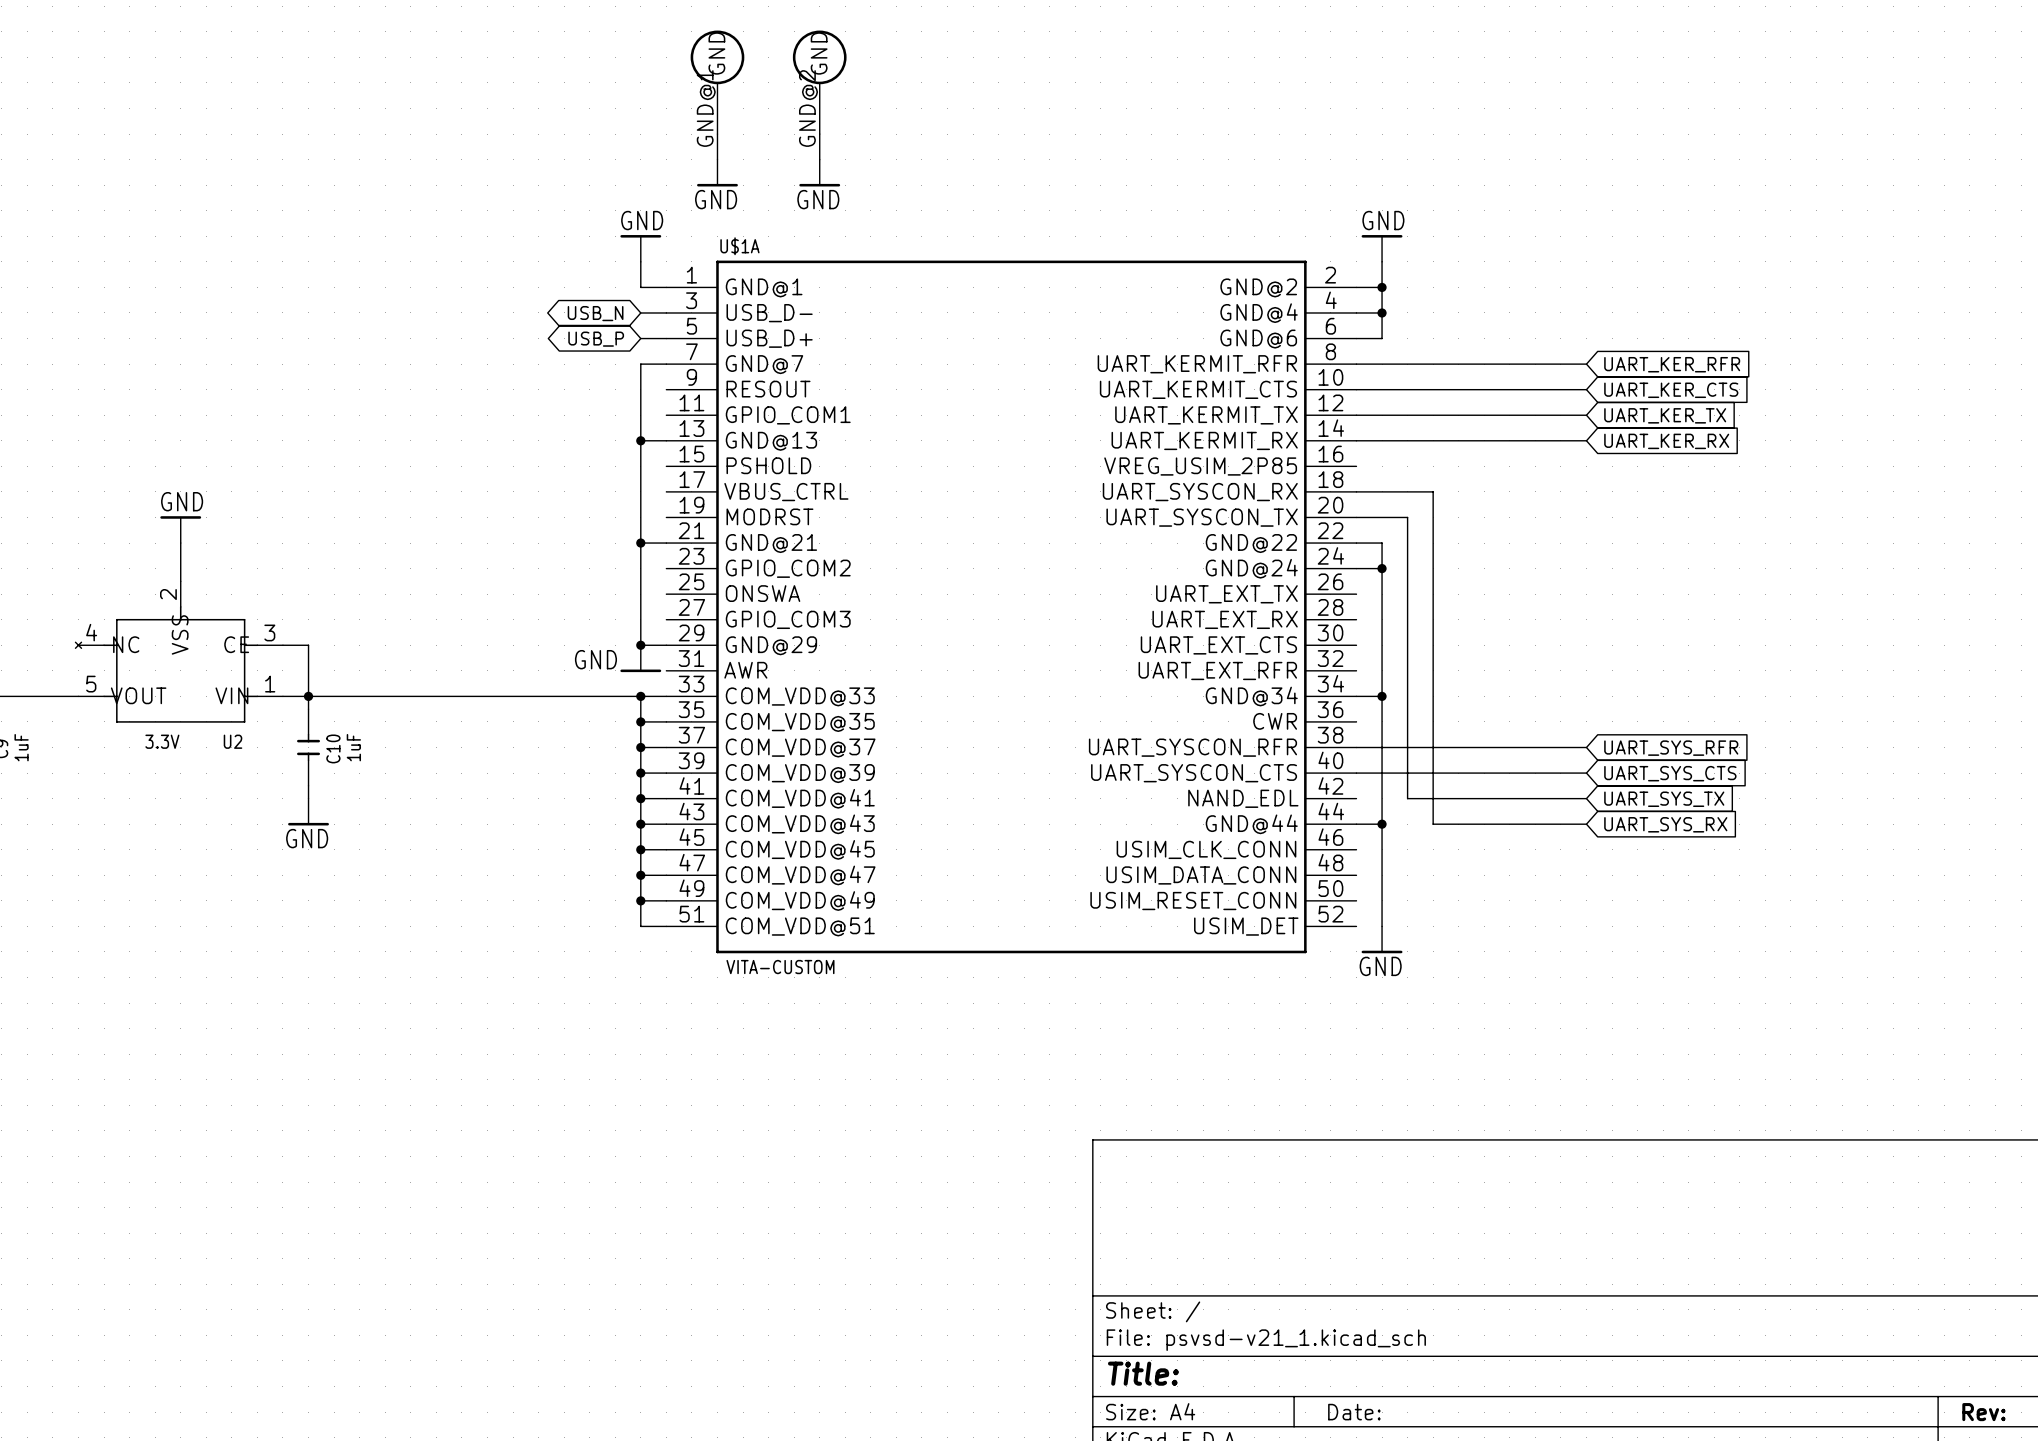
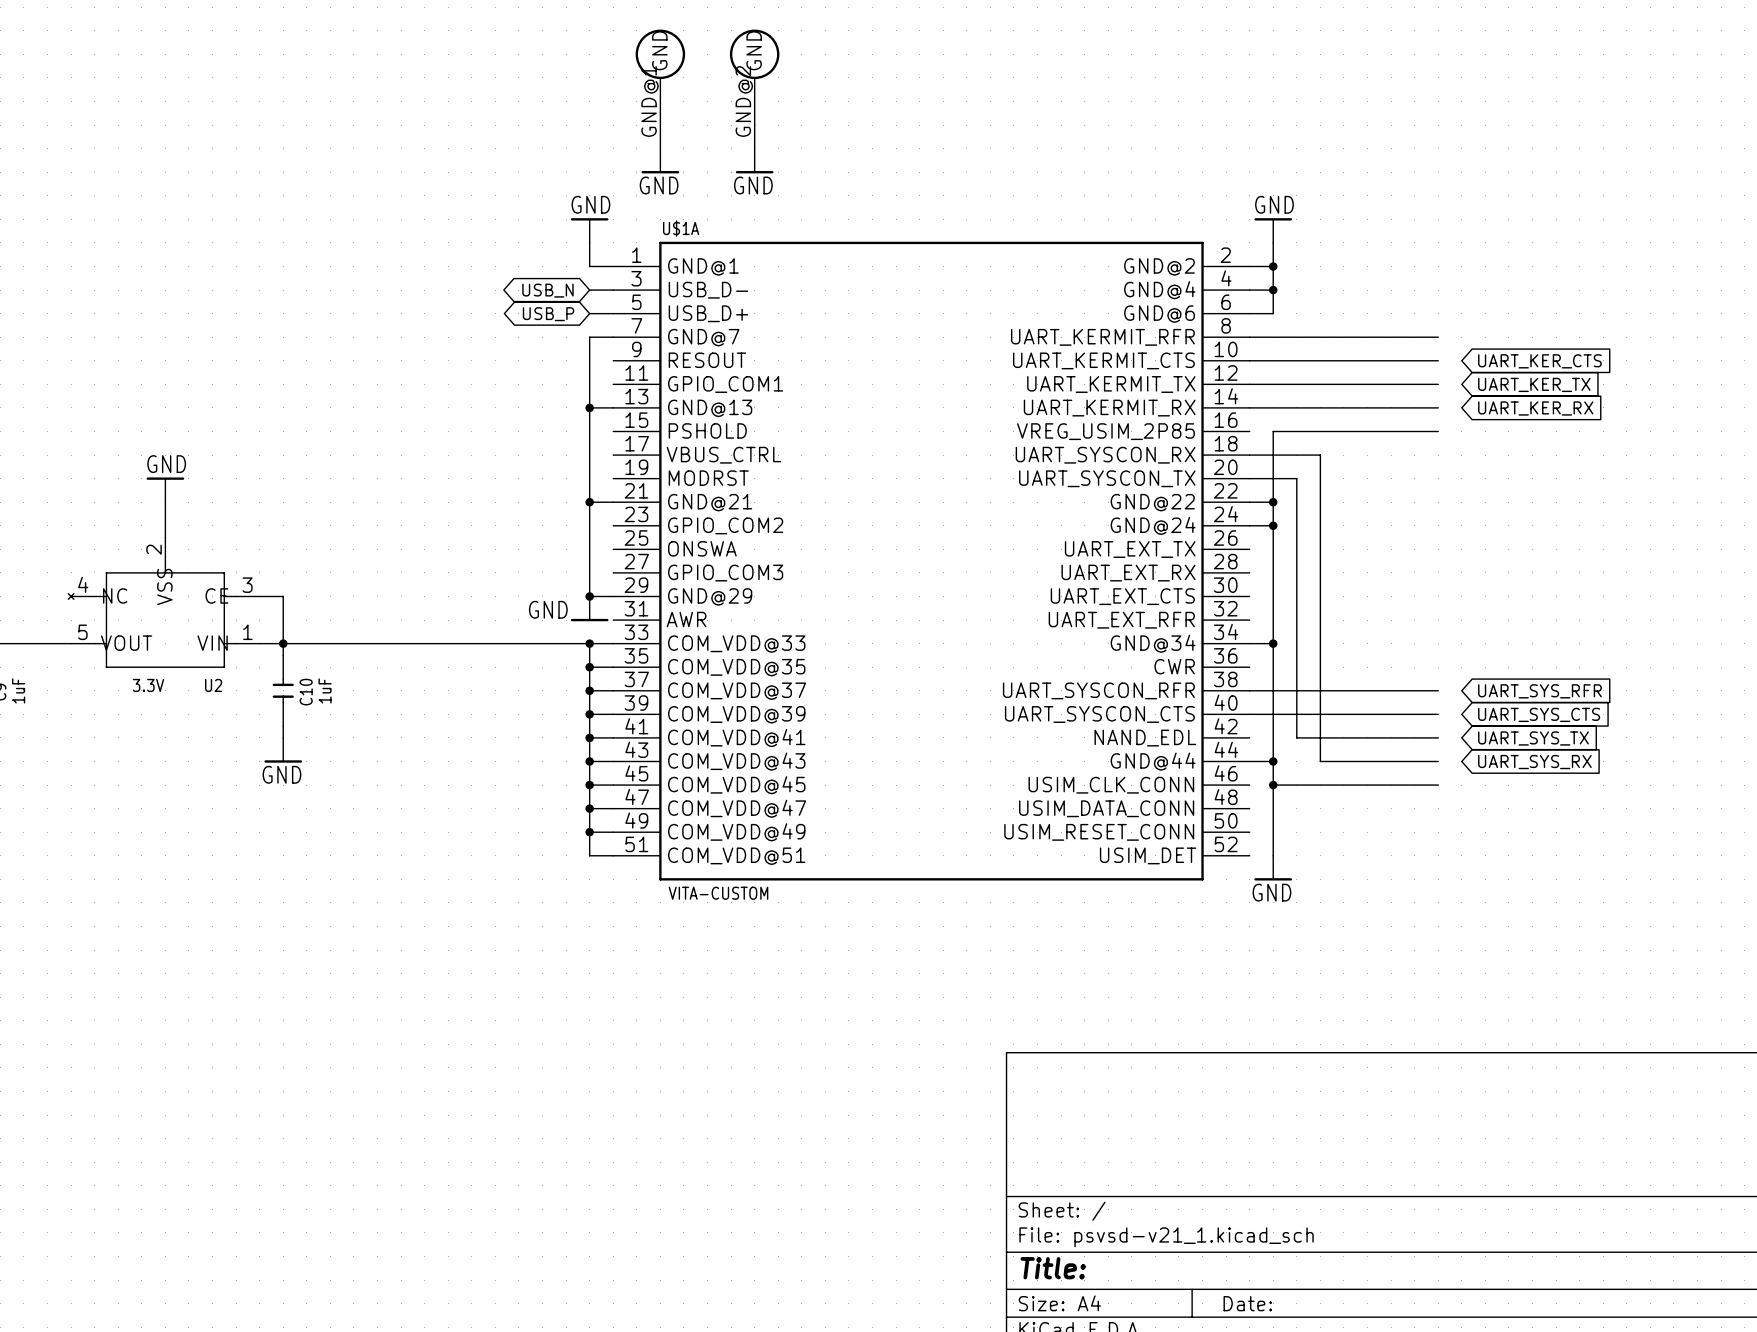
wire: (1560, 364) (1586, 364) -> none
global label: UART_KER_RFR (1672, 364) -> none
wire: (1560, 389) (1586, 389) -> none
wire: (1560, 415) (1586, 415) -> none
wire: (1560, 440) (1586, 440) -> none
wire: none -> (1438, 431) (1273, 431) (1273, 502)
junction: none -> (1273, 502)
wire: (1560, 747) (1586, 747) -> none
wire: (1560, 773) (1586, 773) -> none
wire: (1560, 798) (1586, 798) -> none
wire: (1560, 824) (1586, 824) -> none
wire: none -> (1273, 785) (1438, 785)
junction: none -> (1273, 785)

